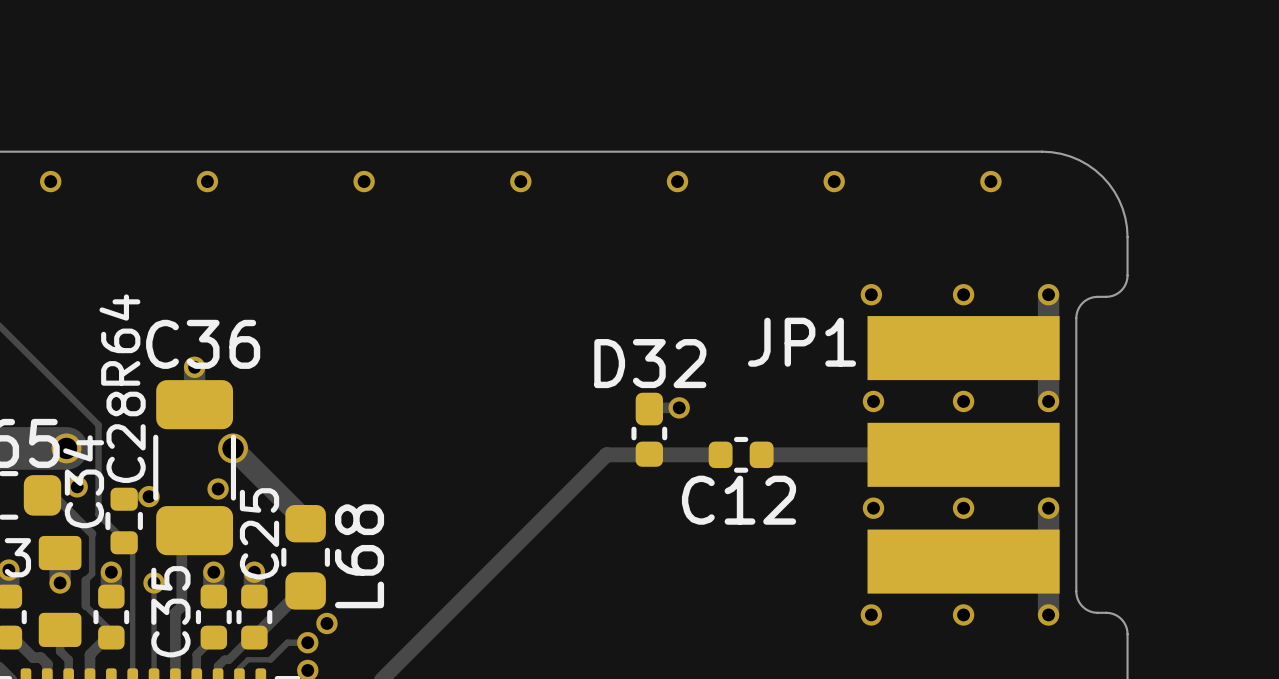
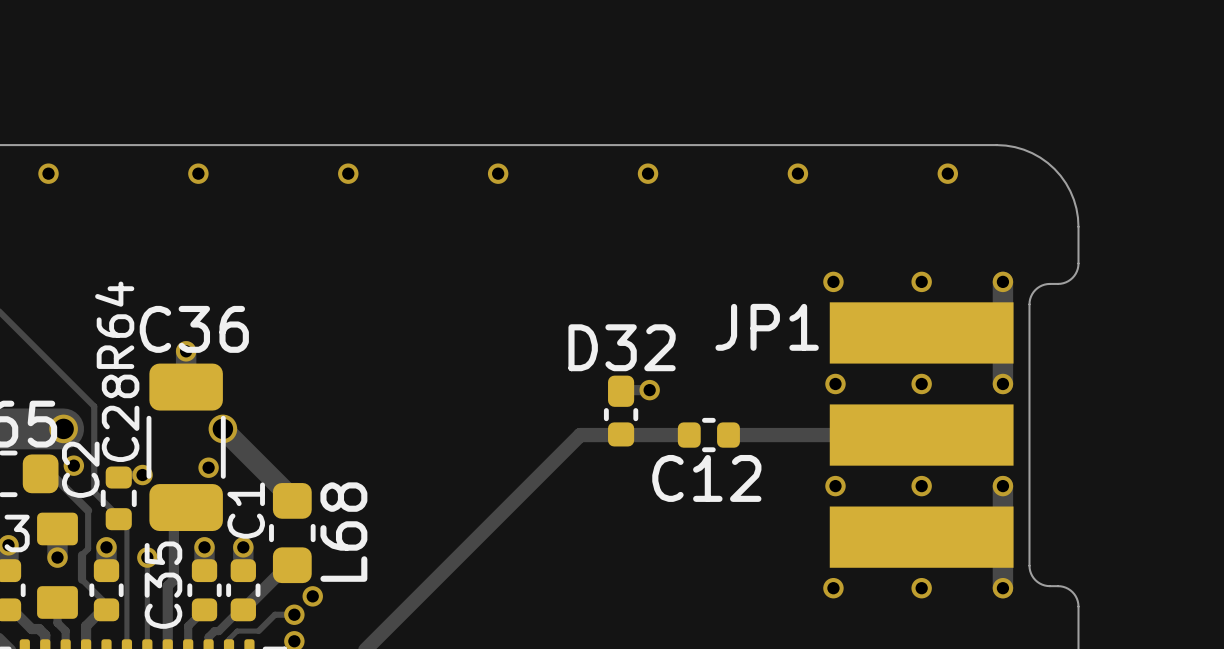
C34 name: C34 (83, 481) -> C2 (80, 469)
C25 name: C25 (259, 533) -> C1 (246, 510)

